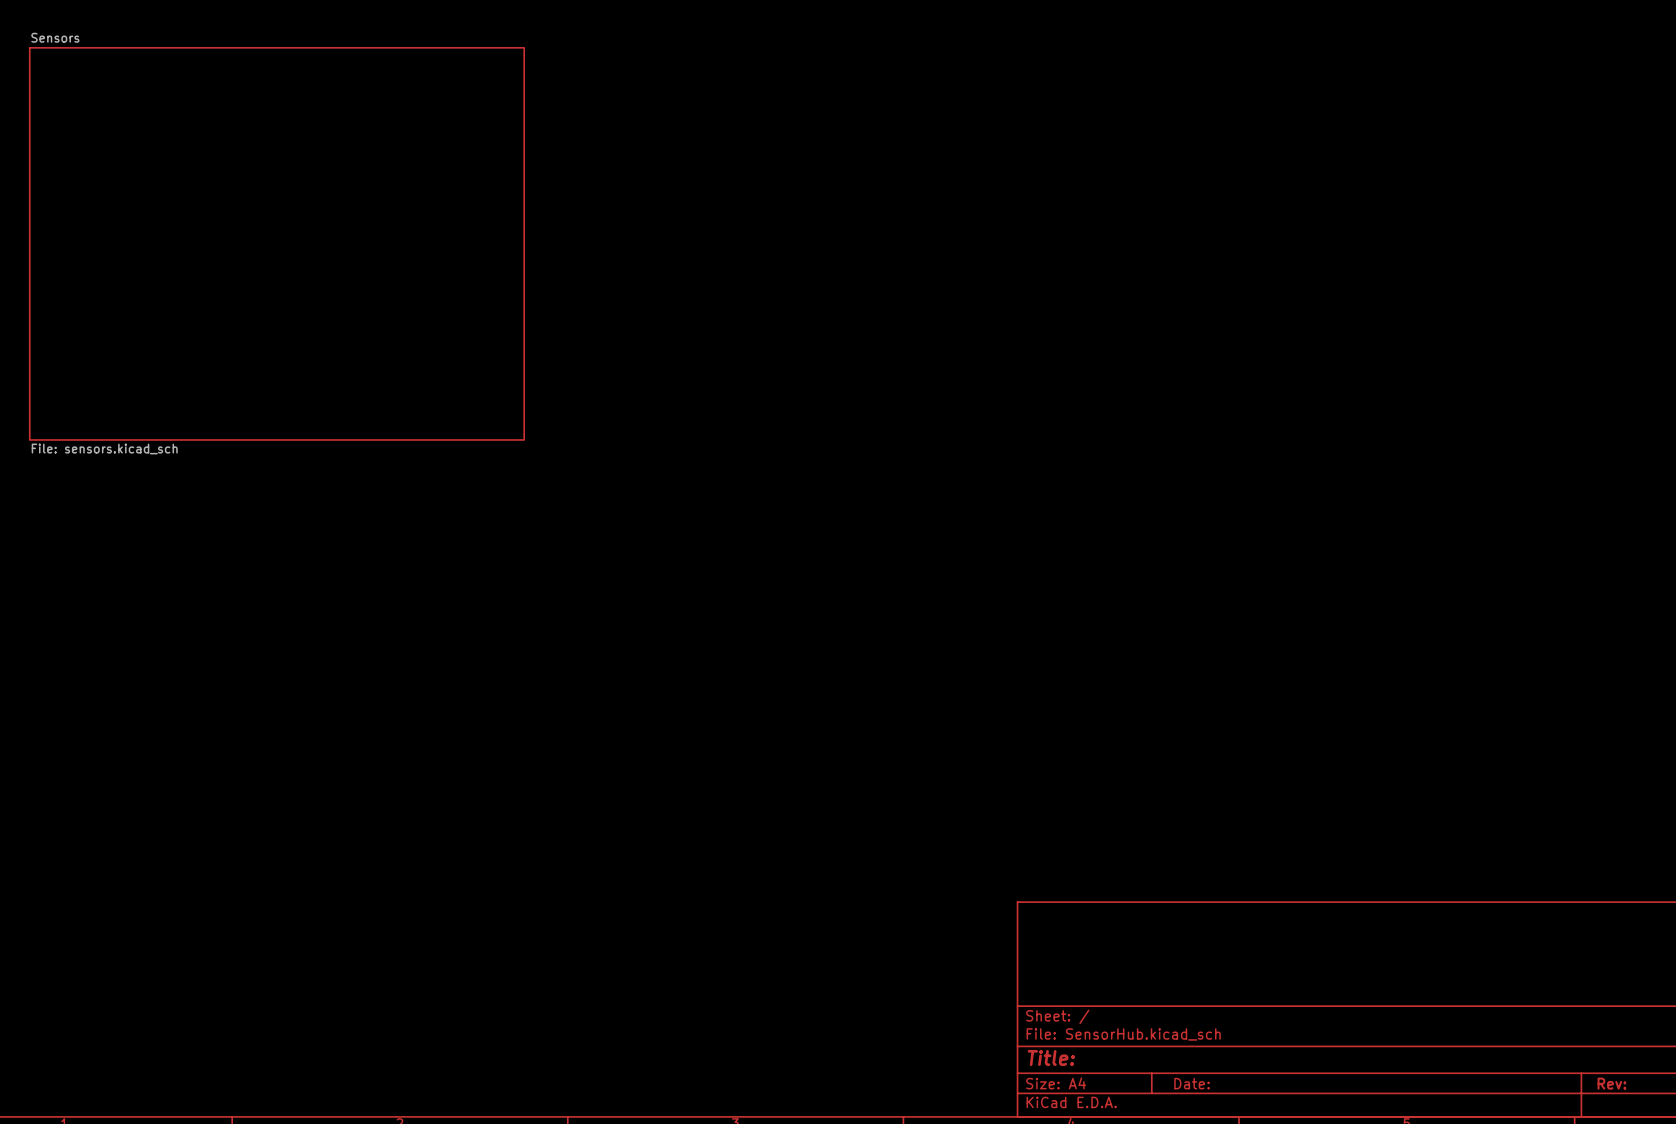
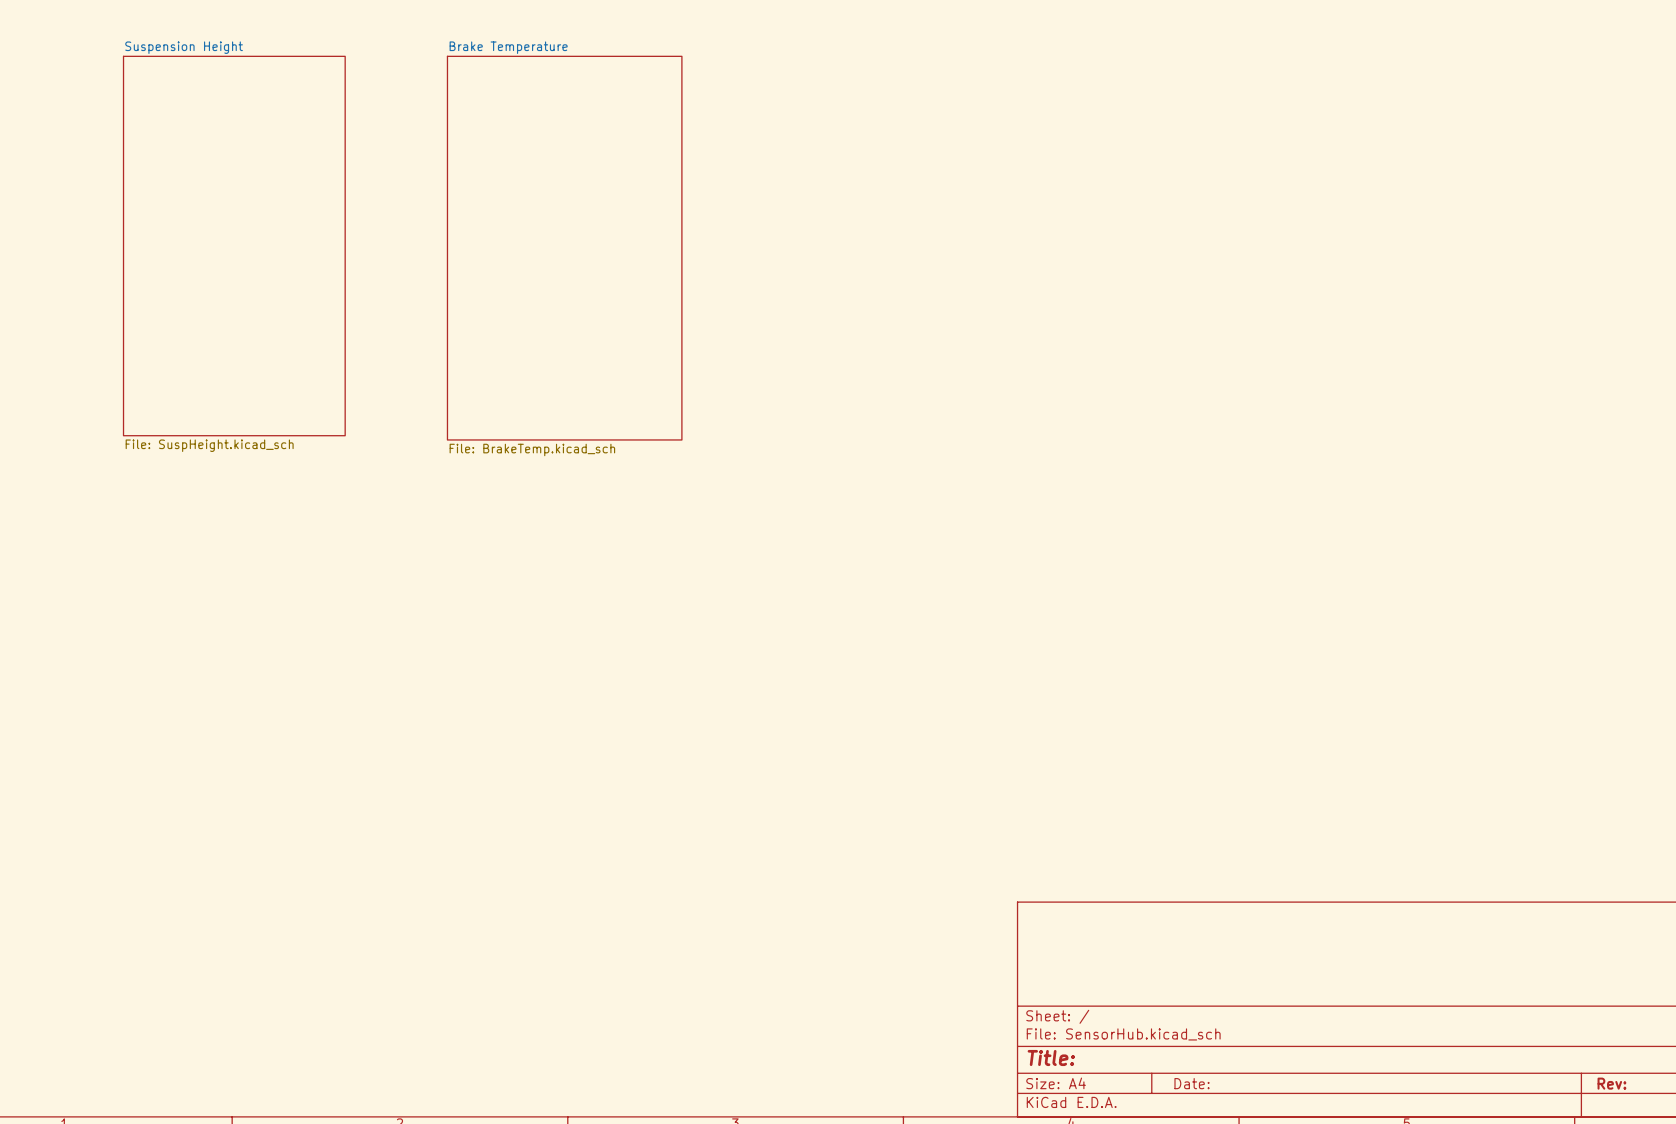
sheet Sensors: File: sensors.kicad_sch (276, 243) -> none
sheet Suspension Height: none -> File: SuspHeight.kicad_sch (234, 246)
sheet Brake Temperature: none -> File: BrakeTemp.kicad_sch (564, 248)

